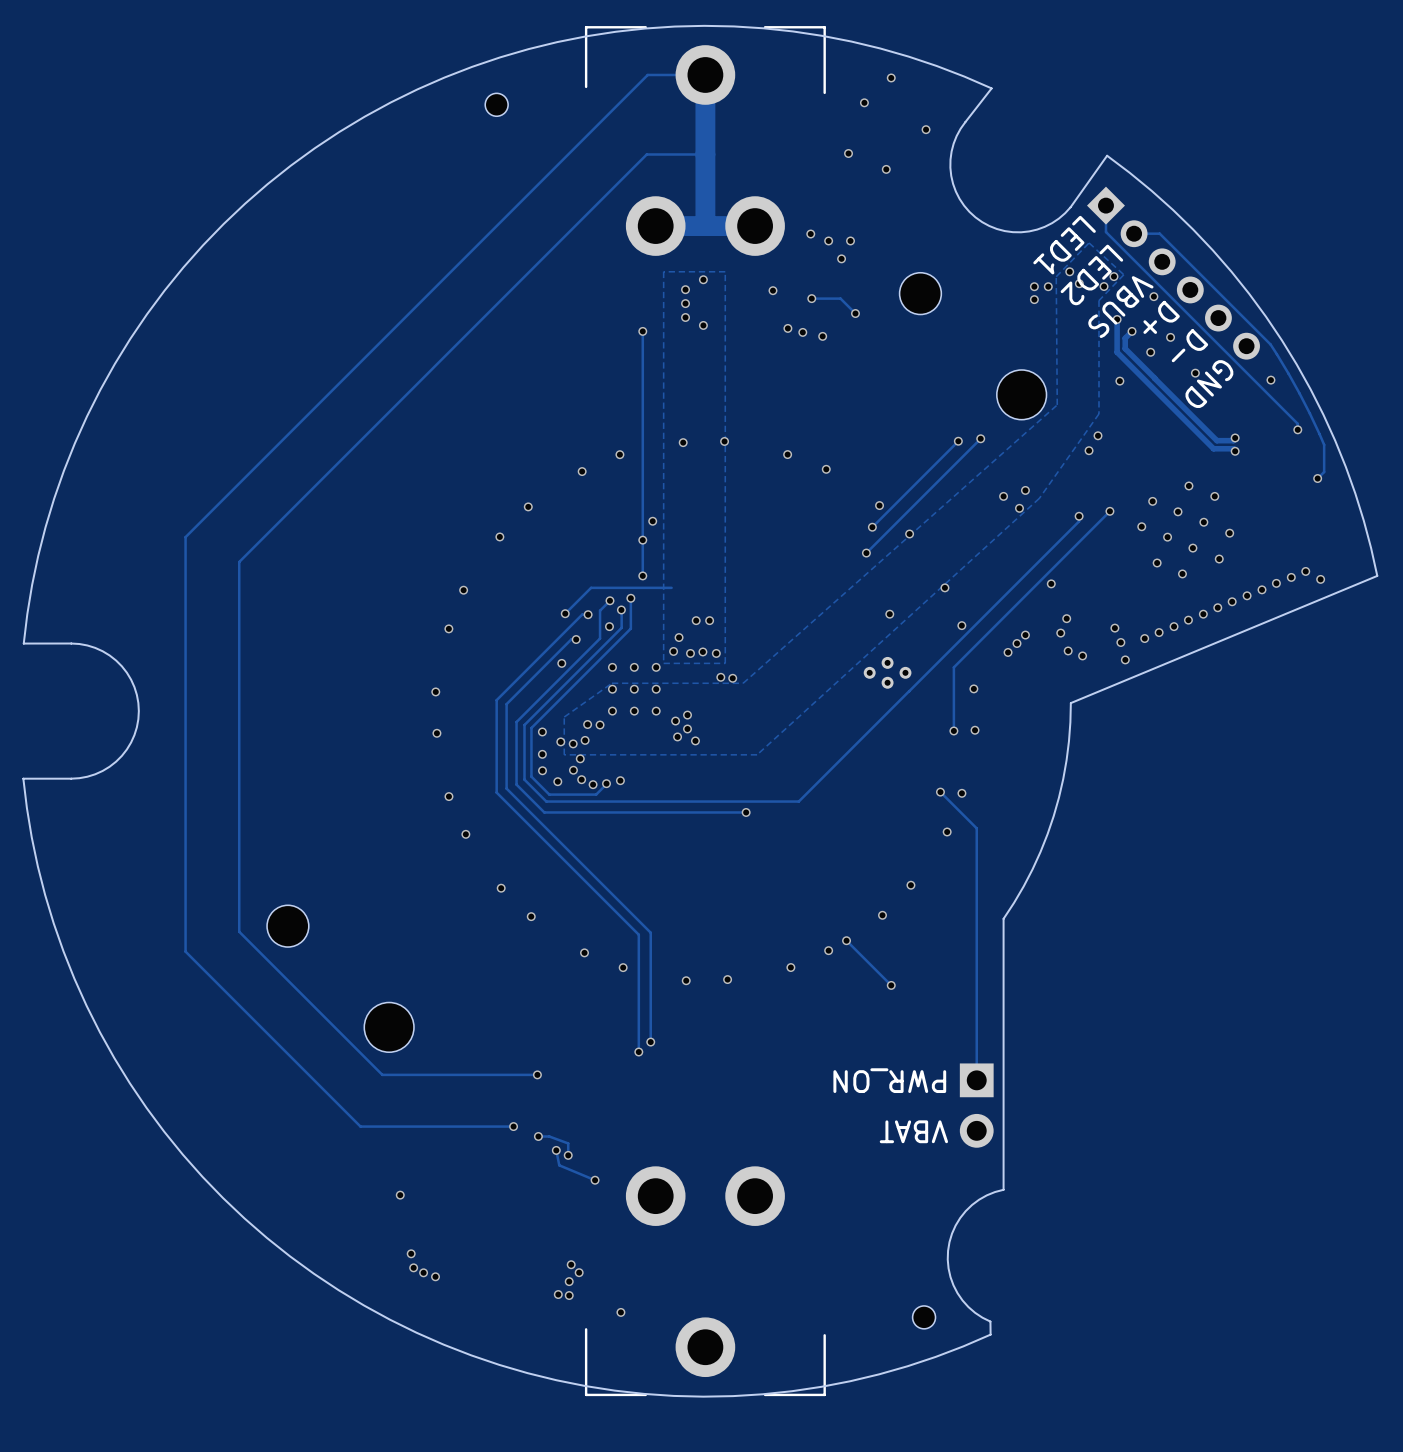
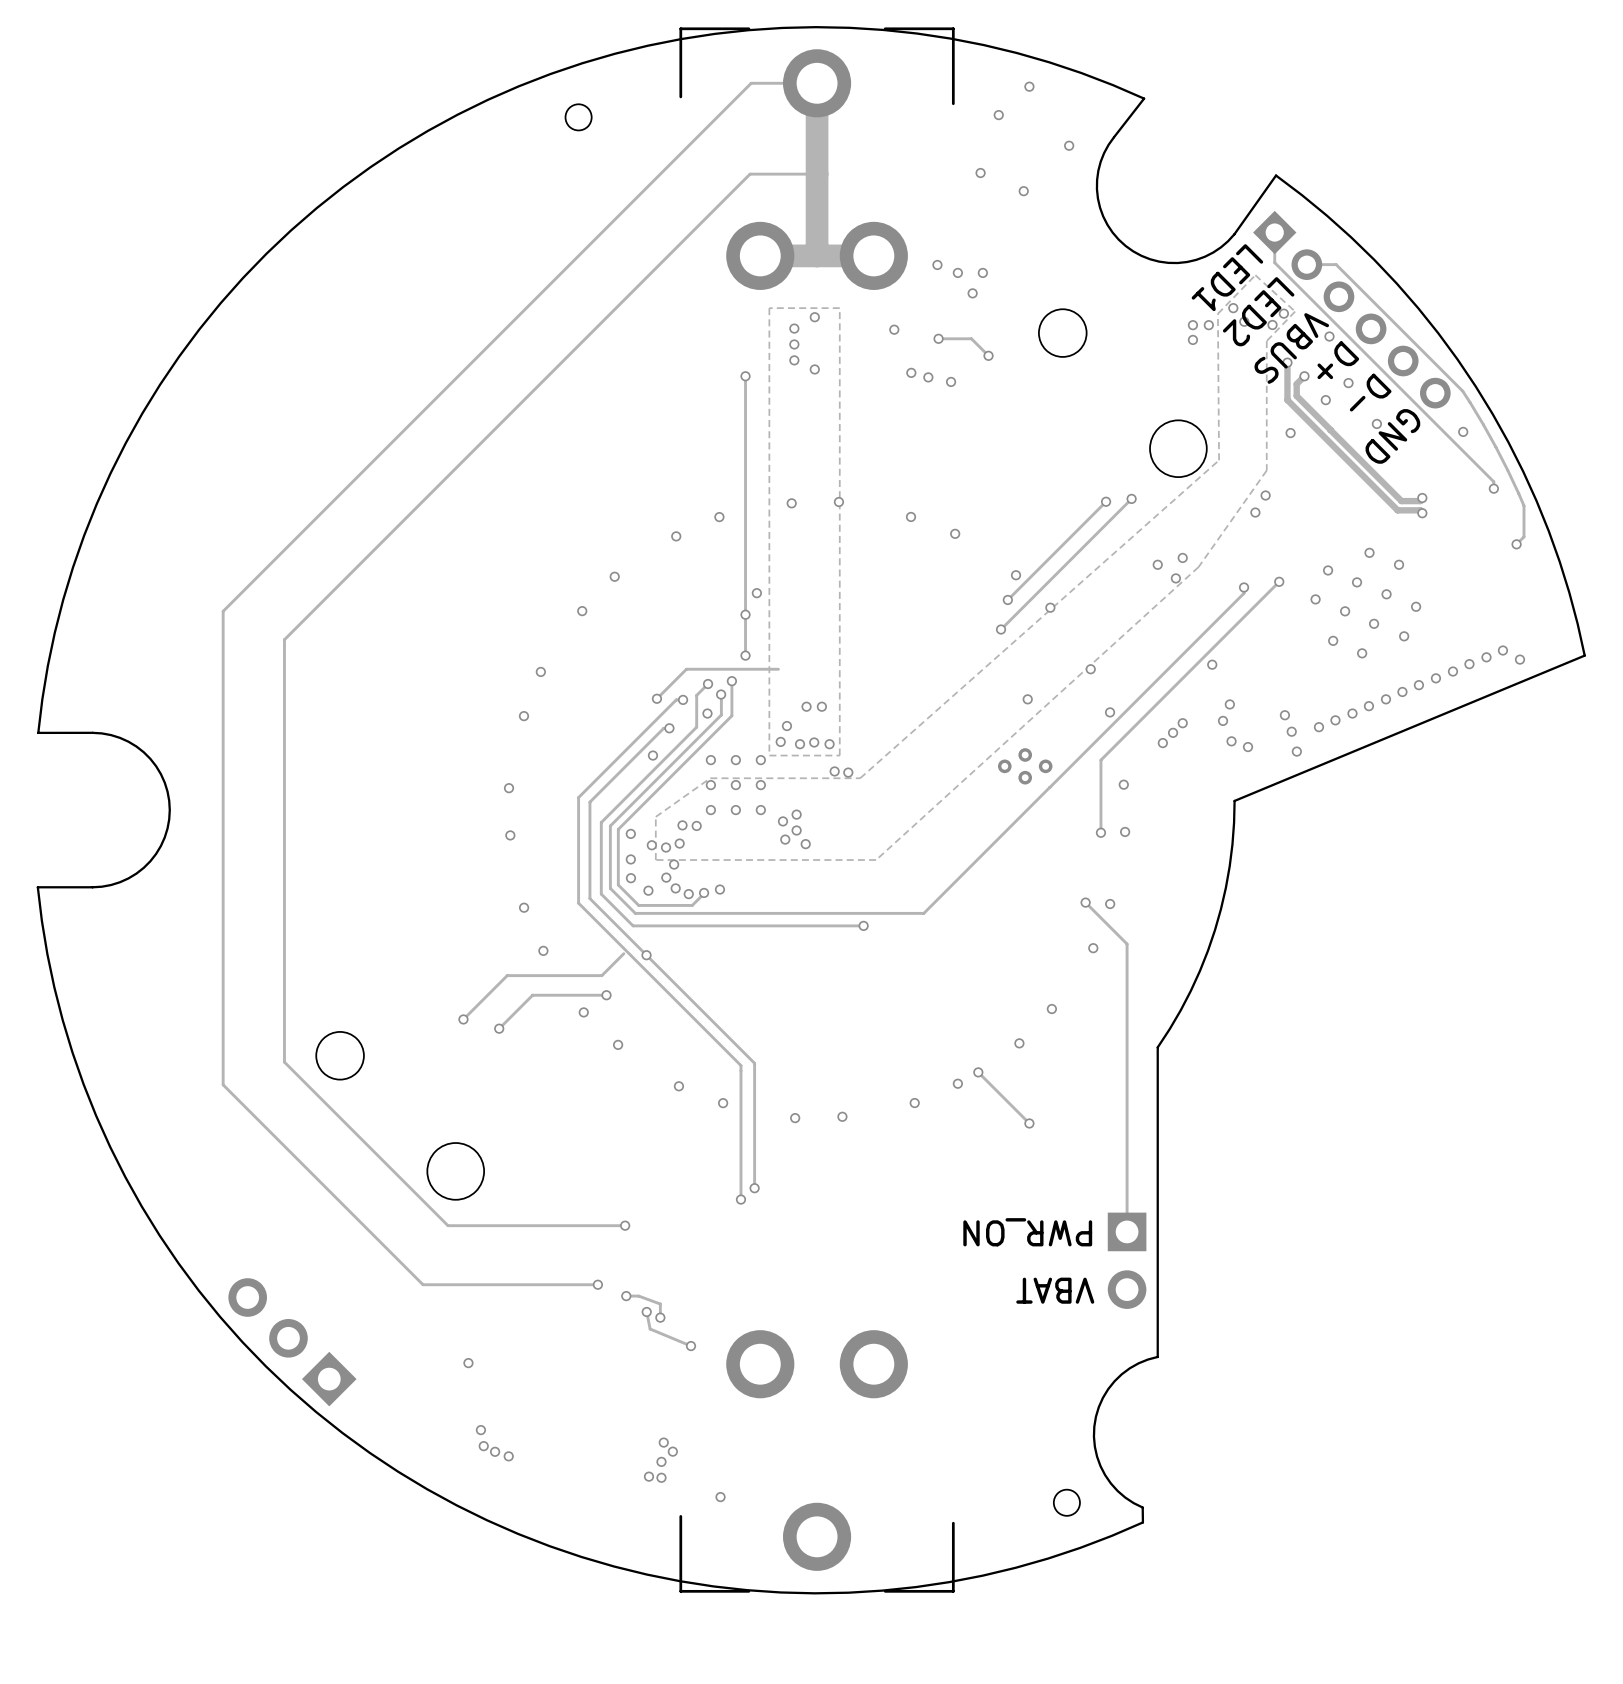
track: none -> (623, 953) (601, 975) (507, 975) (463, 1019)
via: none -> (646, 955)
track: none -> (606, 995) (532, 995) (499, 1028)
via: none -> (606, 995)
via: none -> (463, 1019)
via: none -> (499, 1028)
part: none -> (292, 1342)

